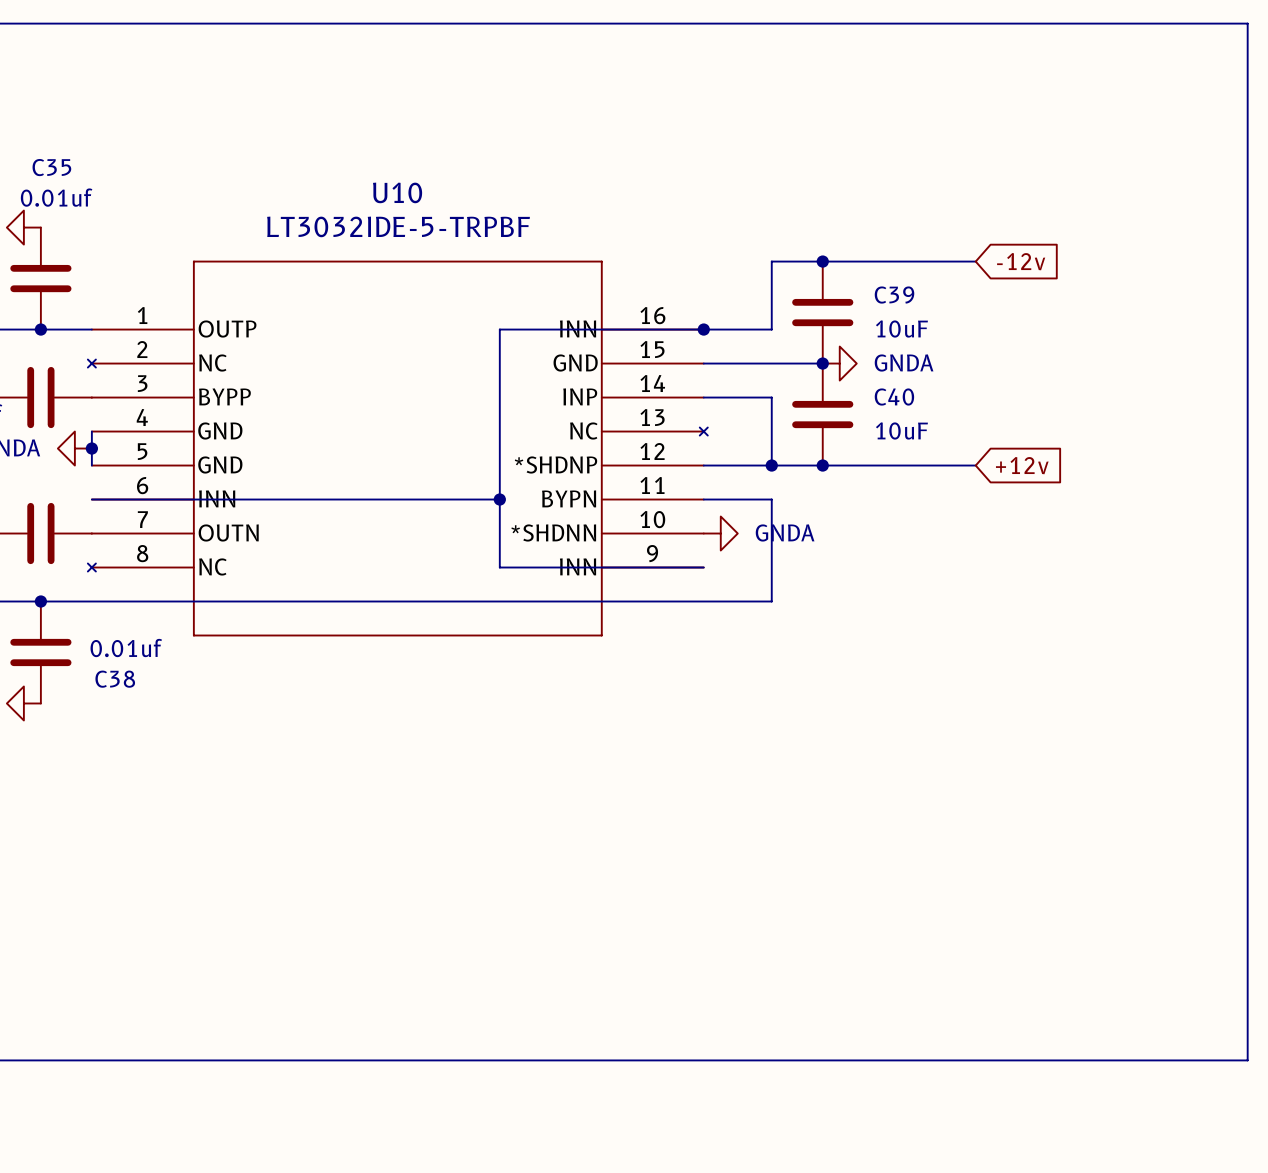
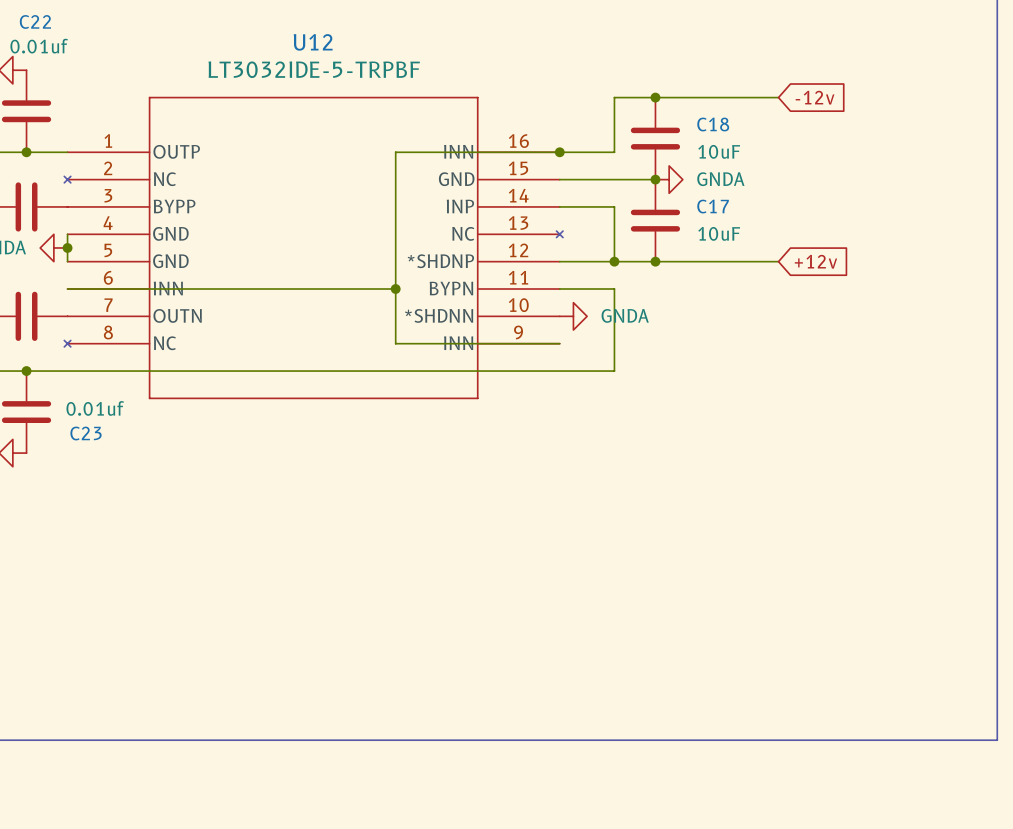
C35 name: C35 (51, 167) -> C22 (35, 21)
U10 name: U10 (397, 192) -> U12 (313, 42)
C39 name: C39 (894, 295) -> C18 (713, 124)
C40 name: C40 (894, 396) -> C17 (713, 206)
C38 name: C38 (115, 679) -> C23 (86, 433)

